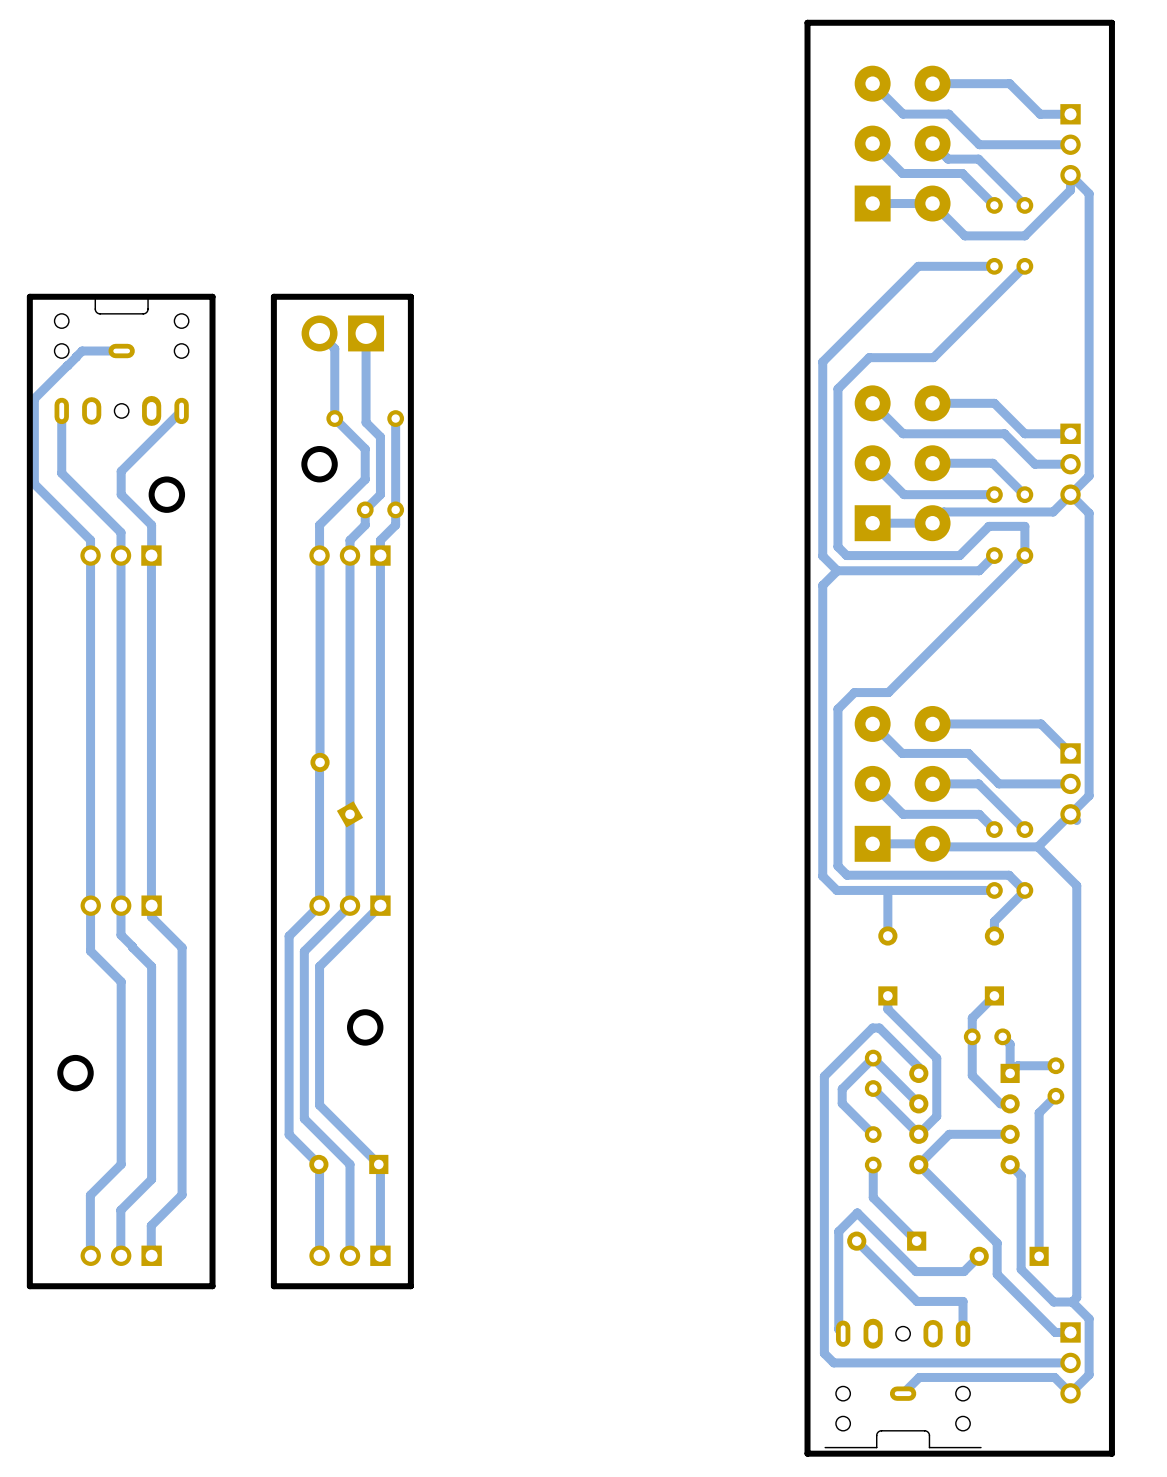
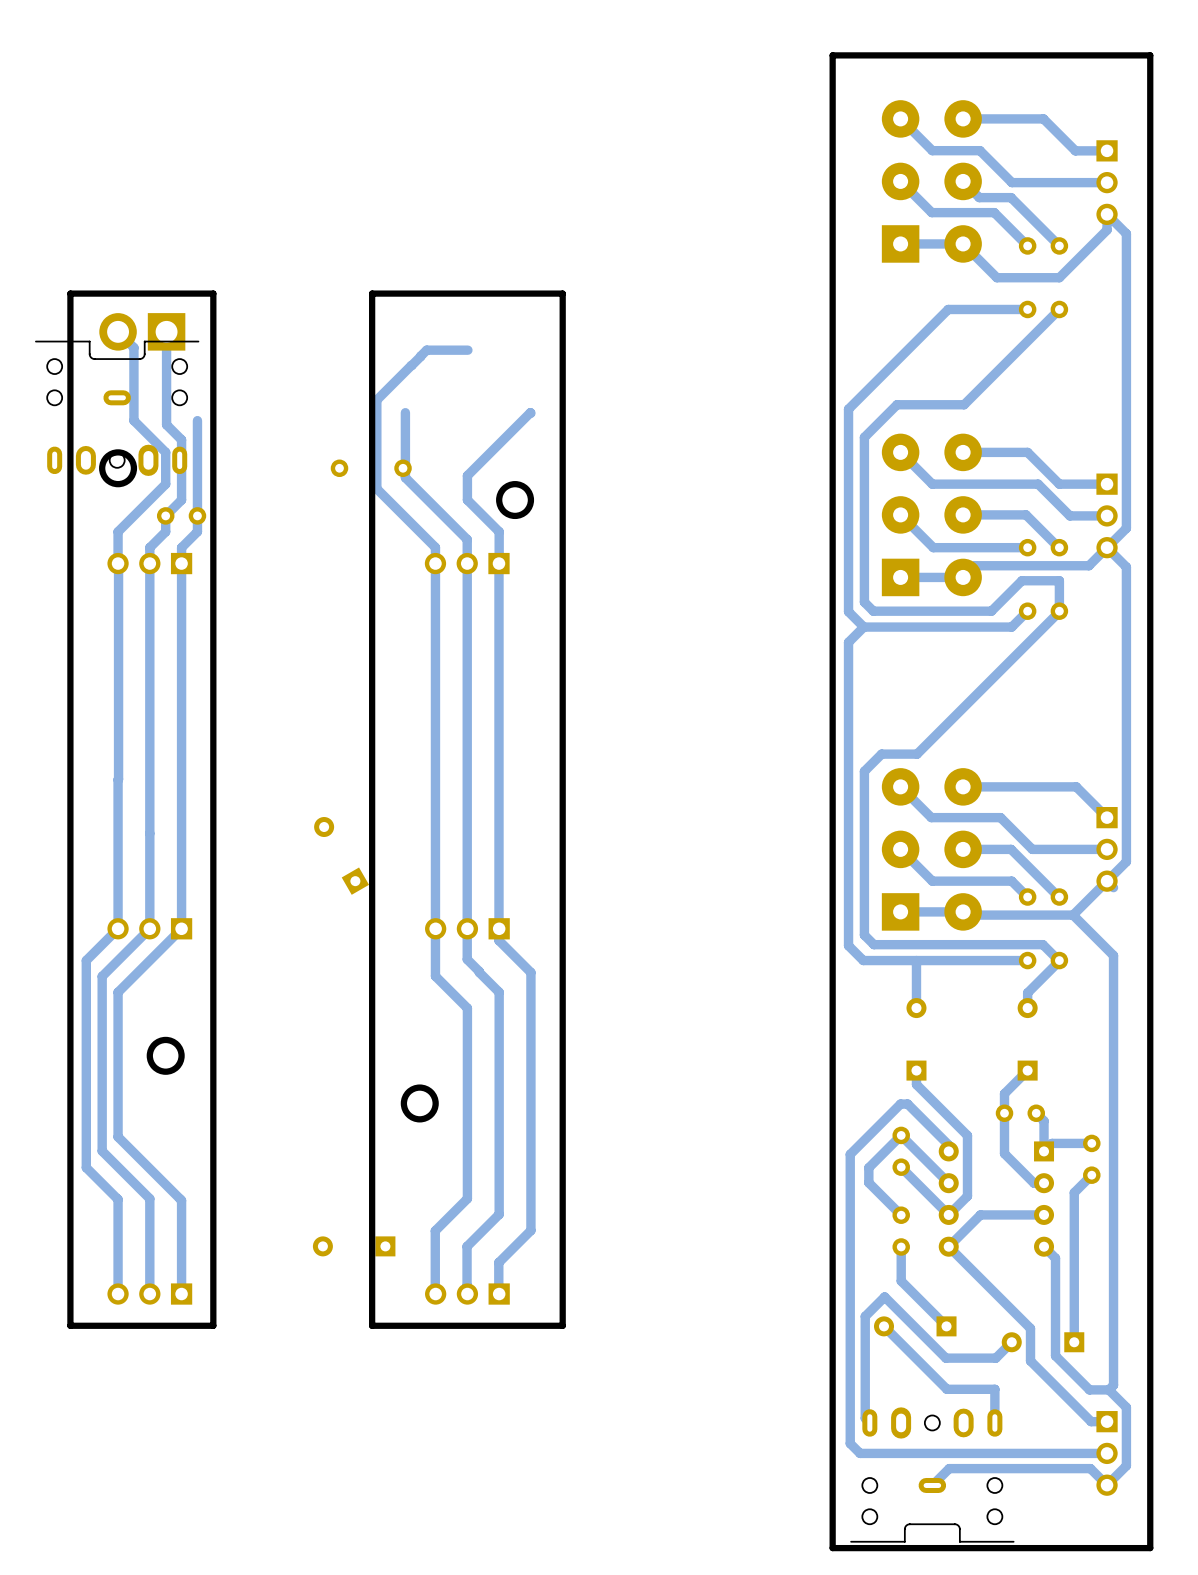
board edge: none -> (562, 293) (372, 293) (372, 1325) (562, 1325) (562, 293)
board edge: (212, 296) (29, 296) (29, 1286) (212, 1286) (212, 296) -> none
board edge: (410, 296) (273, 296) (273, 1286) (410, 1286) (410, 296) -> (213, 293) (70, 293) (70, 1325) (213, 1325) (213, 293)
bottom track: none -> (467, 350) (426, 350) (376, 400) (376, 488) (435, 547) (435, 976) (467, 1008) (467, 1198) (435, 1230) (435, 1285)
bottom track: (319, 333) (334, 348) (334, 418) (365, 449) (365, 479) (319, 525) (319, 905) (289, 936) (289, 1134) (319, 1165) (319, 1255) -> (118, 331) (133, 347) (133, 420) (165, 452) (165, 484) (118, 531) (118, 928) (86, 960) (86, 1167) (118, 1199) (118, 1294)
part position: (342, 333) -> (142, 331)
bottom track: (366, 333) (366, 422) (380, 436) (380, 494) (365, 509) (365, 525) (350, 540) (350, 905) (304, 951) (304, 1118) (350, 1164) (350, 1255) -> (166, 331) (166, 424) (181, 439) (181, 500) (165, 515) (165, 531) (149, 547) (149, 928) (102, 976) (102, 1151) (149, 1198) (149, 1294)
bottom track: (121, 351) (82, 351) (34, 398) (34, 483) (90, 540) (90, 951) (121, 981) (121, 1164) (90, 1195) (90, 1247) -> none
bottom track: none -> (405, 412) (405, 477) (467, 539) (467, 959) (499, 992) (499, 1214) (467, 1246) (467, 1285)
bottom track: none -> (530, 413) (467, 475) (467, 500) (499, 531) (498, 940) (530, 972) (530, 1230) (498, 1262) (498, 1285)
bottom track: (61, 410) (61, 473) (121, 532) (121, 935) (151, 966) (151, 1179) (120, 1210) (121, 1247) -> none
bottom track: (182, 411) (121, 471) (121, 494) (151, 525) (151, 917) (182, 947) (182, 1194) (151, 1225) (151, 1247) -> none
bottom track: (395, 418) (395, 525) (380, 540) (380, 905) (319, 966) (319, 1105) (380, 1166) (380, 1255) -> (197, 420) (197, 531) (181, 547) (181, 928) (118, 992) (118, 1136) (181, 1200) (181, 1294)
round board edge: none -> [496, 481, 535, 520]
round board edge: [301, 446, 338, 483] -> none
round board edge position: (166, 494) -> (118, 468)
part position: (380, 509) -> (181, 515)
part: none -> (467, 563)
part position: (121, 555) -> (149, 563)
part: (350, 555) -> none
part: none -> (467, 928)
part position: (121, 905) -> (149, 928)
part: (350, 905) -> none
round board edge: none -> [146, 1036, 185, 1075]
round board edge position: (365, 1027) -> (419, 1103)
round board edge: [57, 1054, 94, 1092] -> none
part: none -> (467, 1294)
part position: (121, 1255) -> (149, 1294)
part: (350, 1255) -> none

